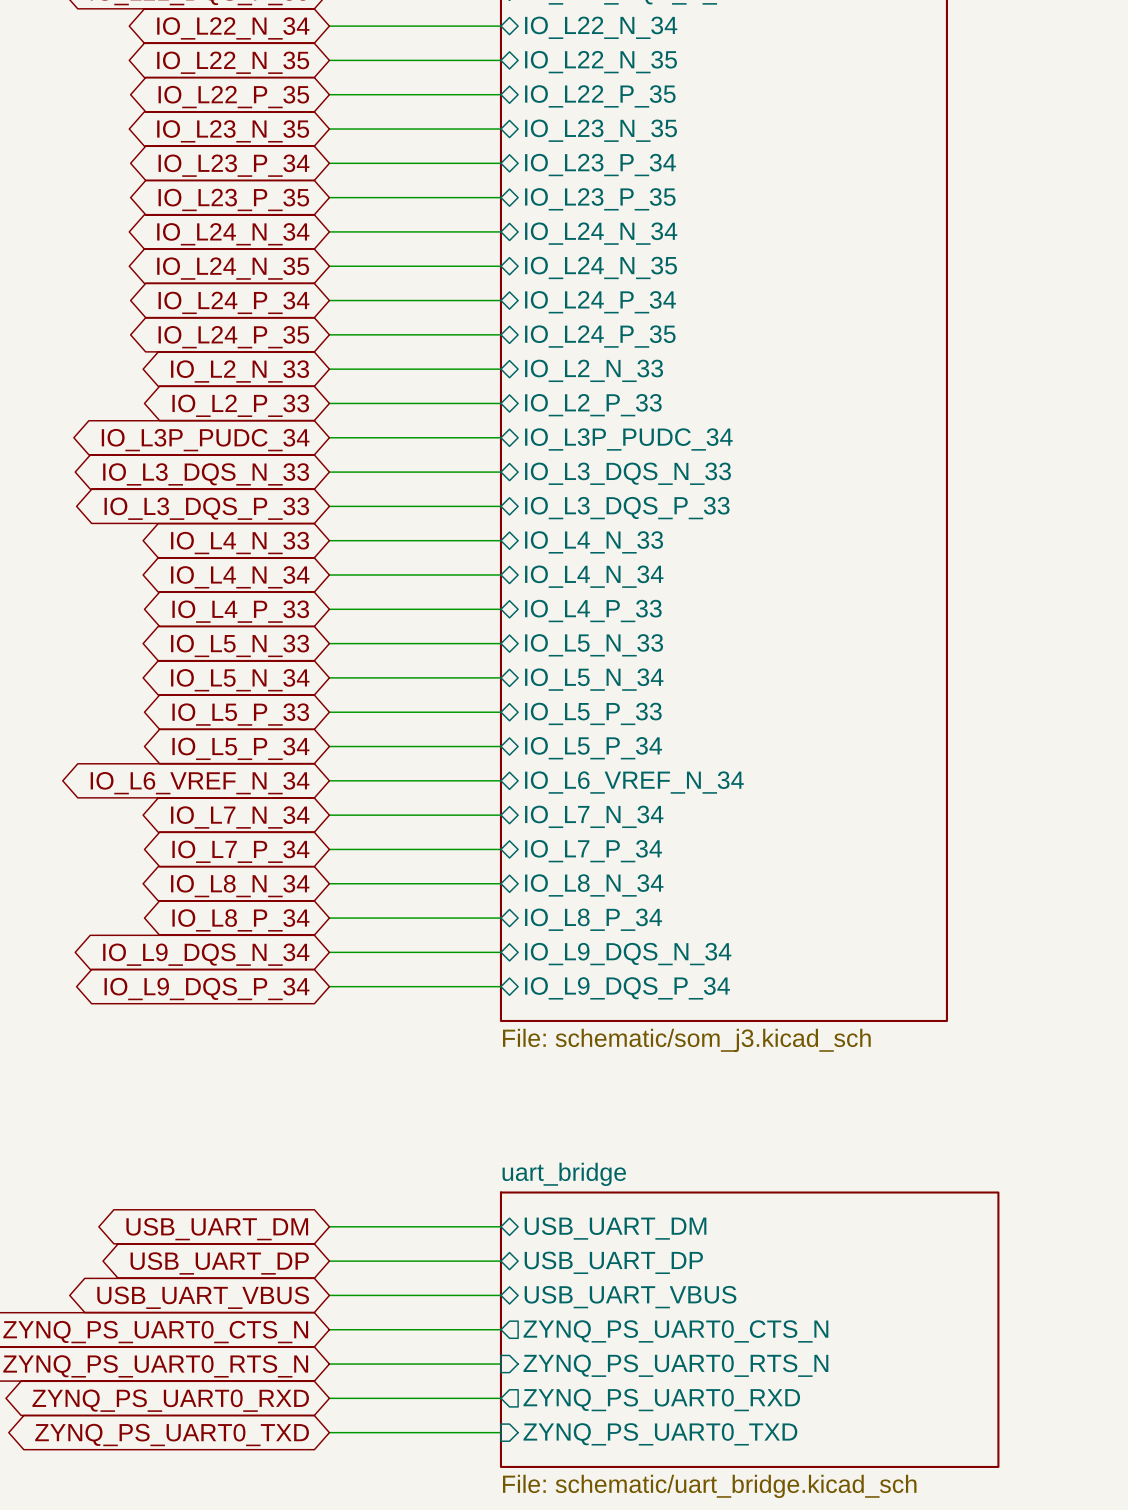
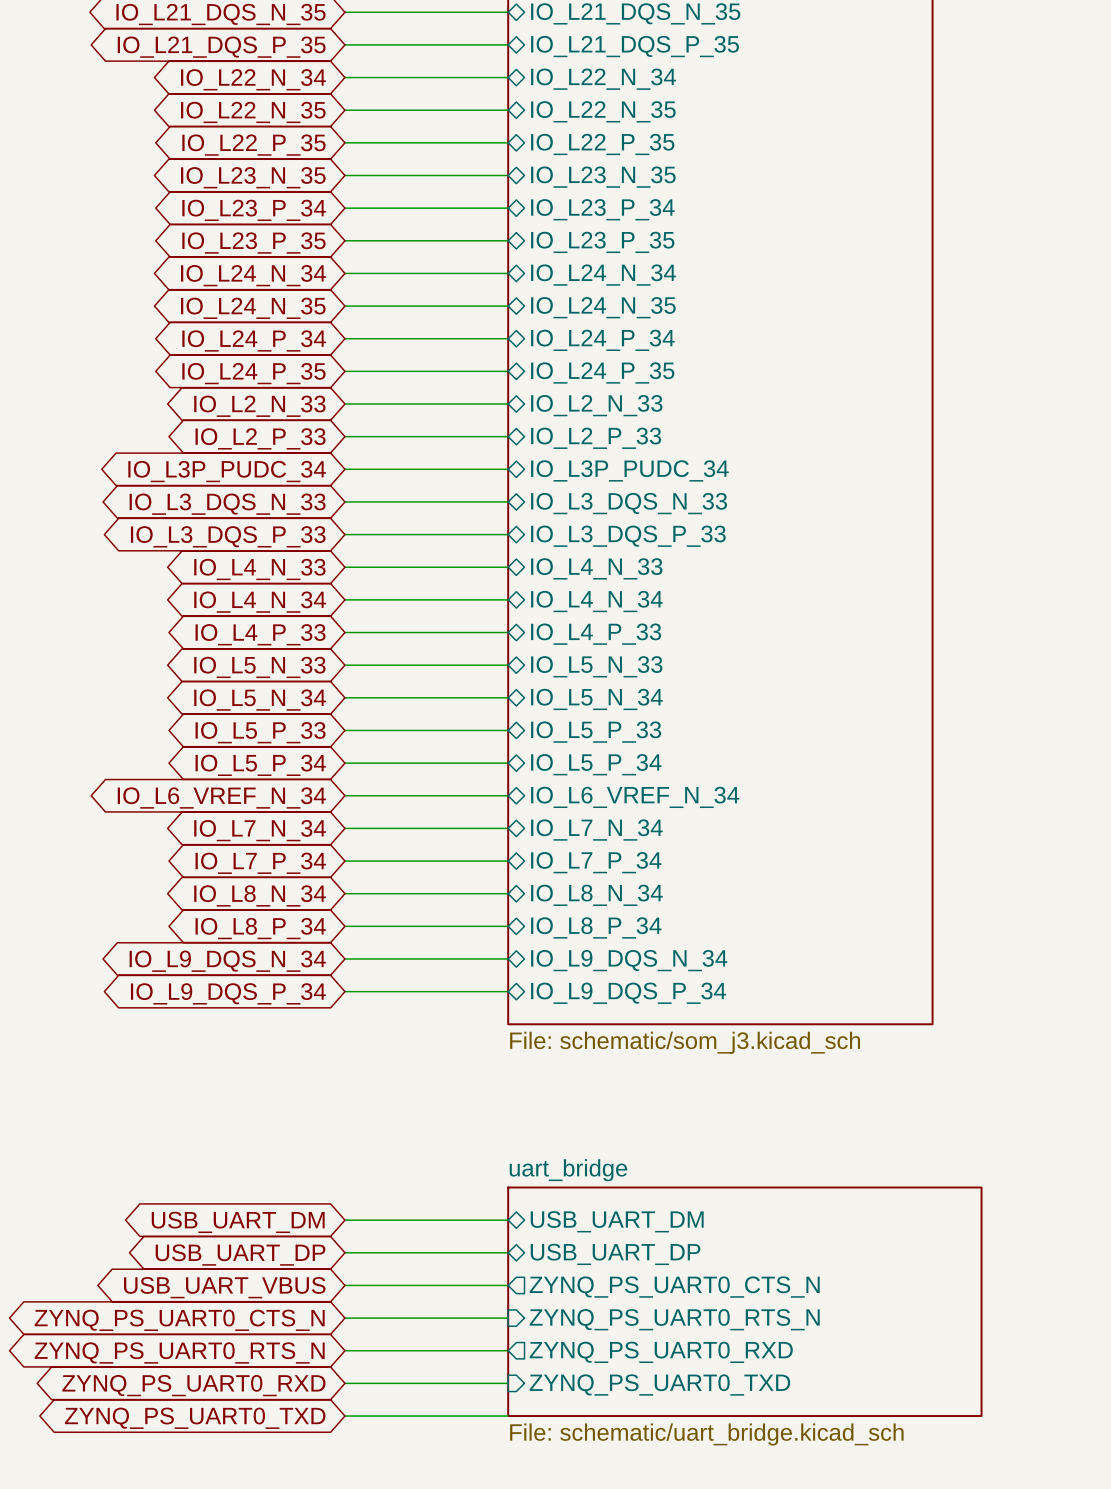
sheet pin shape: bidirectional (630, 1297) -> output (674, 1287)
sheet pin: USB_UART_VBUS (630, 1297) -> ZYNQ_PS_UART0_CTS_N (674, 1287)
sheet uart_bridge: none -> File: schematic/uart_bridge.kicad_sch (744, 1301)
sheet uart_bridge: File: schematic/uart_bridge.kicad_sch (749, 1329) -> none
sheet pin shape: output (675, 1331) -> input (674, 1319)
sheet pin: ZYNQ_PS_UART0_CTS_N (675, 1331) -> ZYNQ_PS_UART0_RTS_N (674, 1319)
sheet pin shape: input (675, 1365) -> output (661, 1352)
sheet pin: ZYNQ_PS_UART0_RTS_N (675, 1365) -> ZYNQ_PS_UART0_RXD (661, 1352)
sheet pin shape: output (661, 1400) -> input (659, 1385)
sheet pin: ZYNQ_PS_UART0_RXD (661, 1400) -> ZYNQ_PS_UART0_TXD (659, 1385)
sheet pin: ZYNQ_PS_UART0_TXD (660, 1434) -> none

